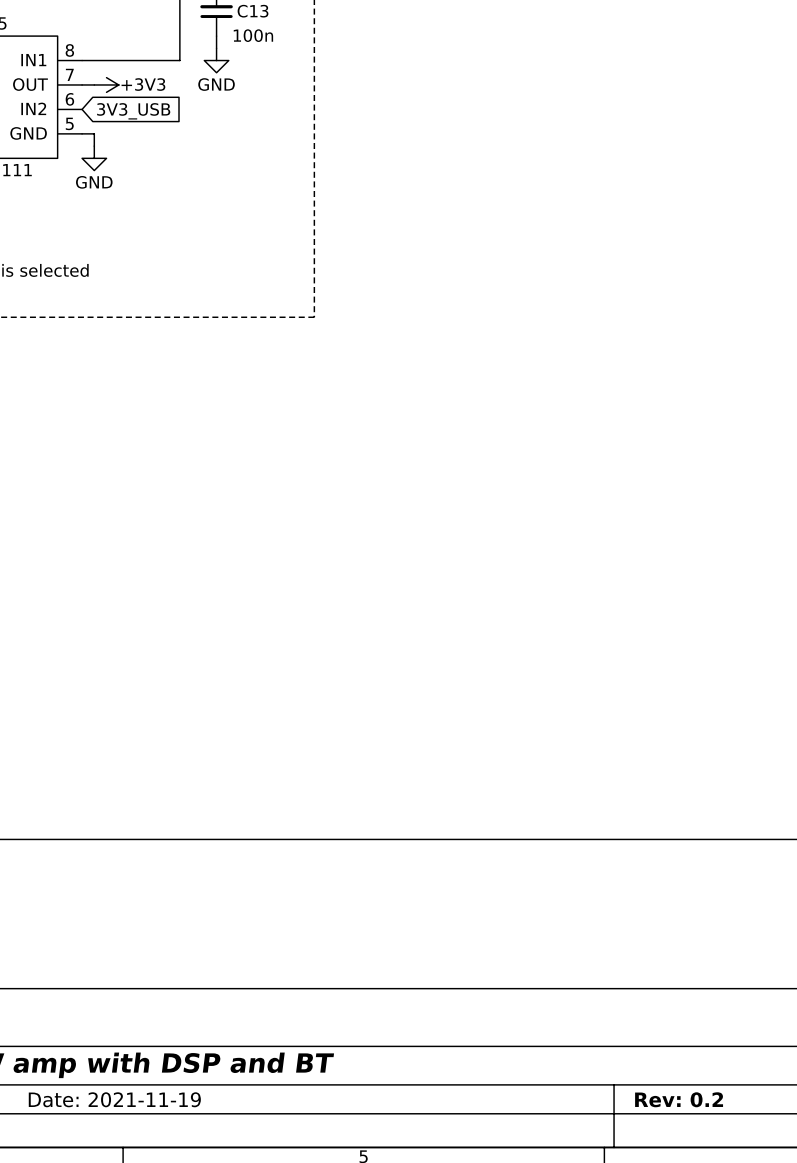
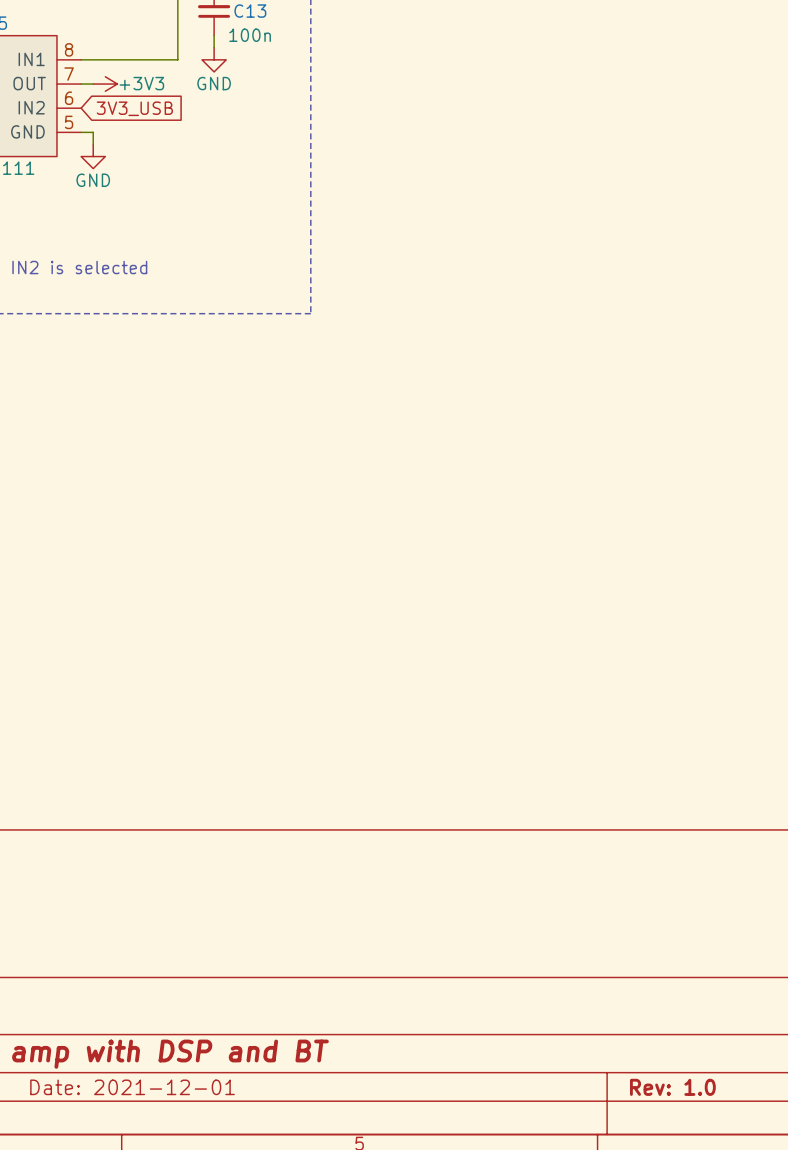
title block: Date: 2021-11-19 (114, 1099) -> Date: 2021-12-01 (132, 1087)
title block: Rev: 0.2 (679, 1099) -> Rev: 1.0 (672, 1087)

